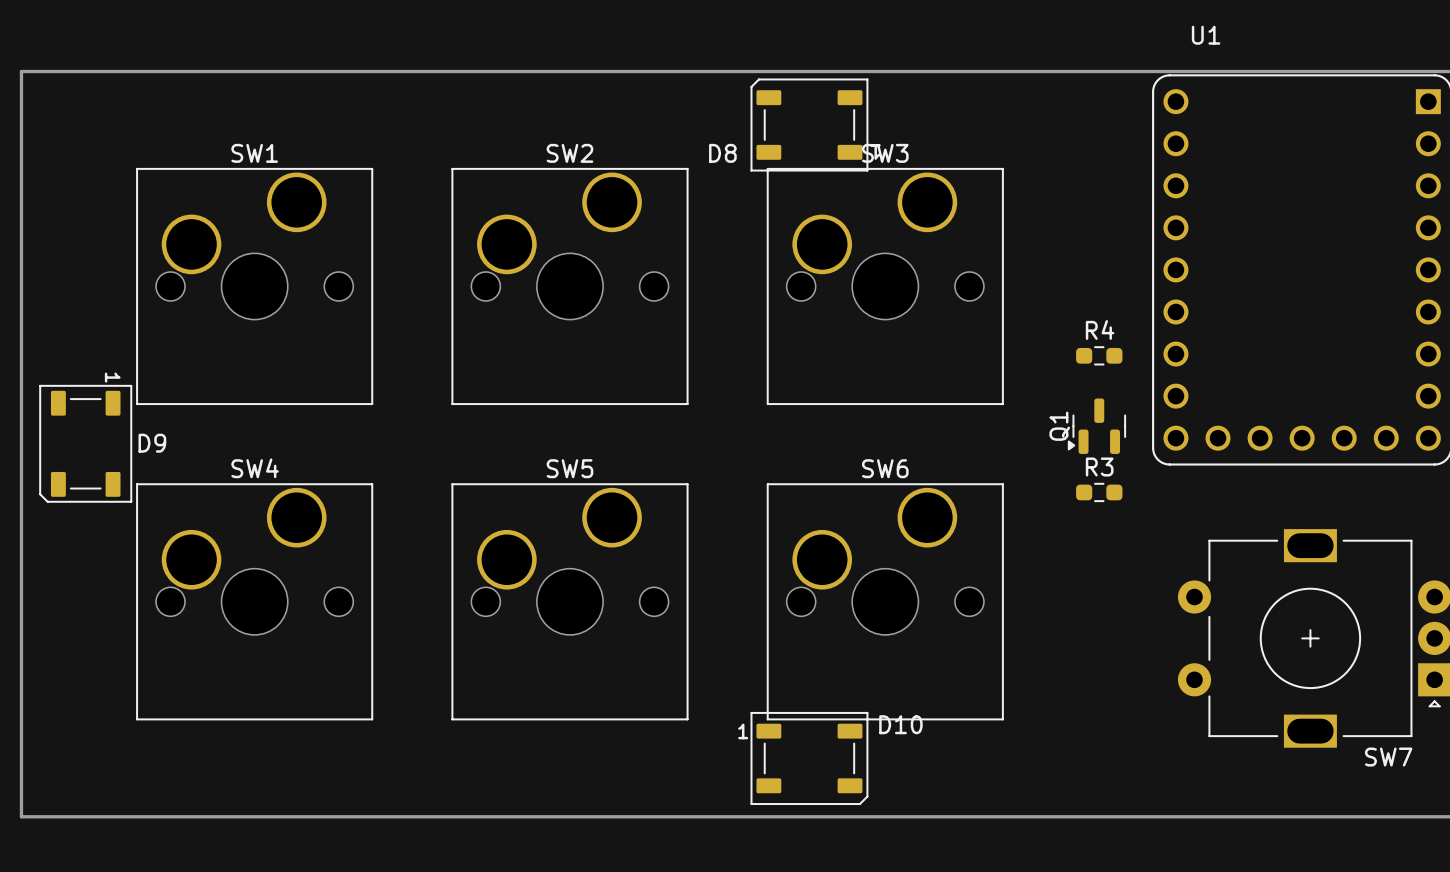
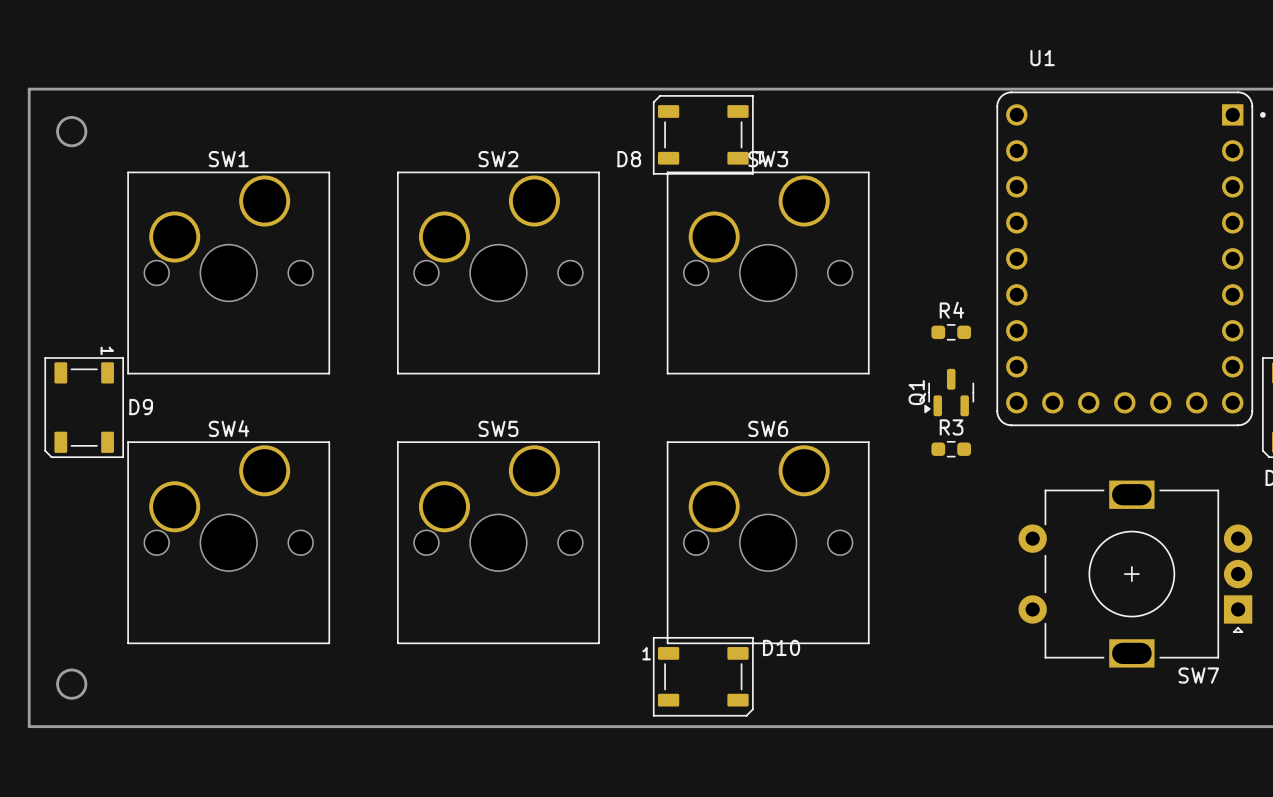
round board edge: none -> [56, 116, 88, 148]
round board edge: none -> [56, 668, 88, 700]

